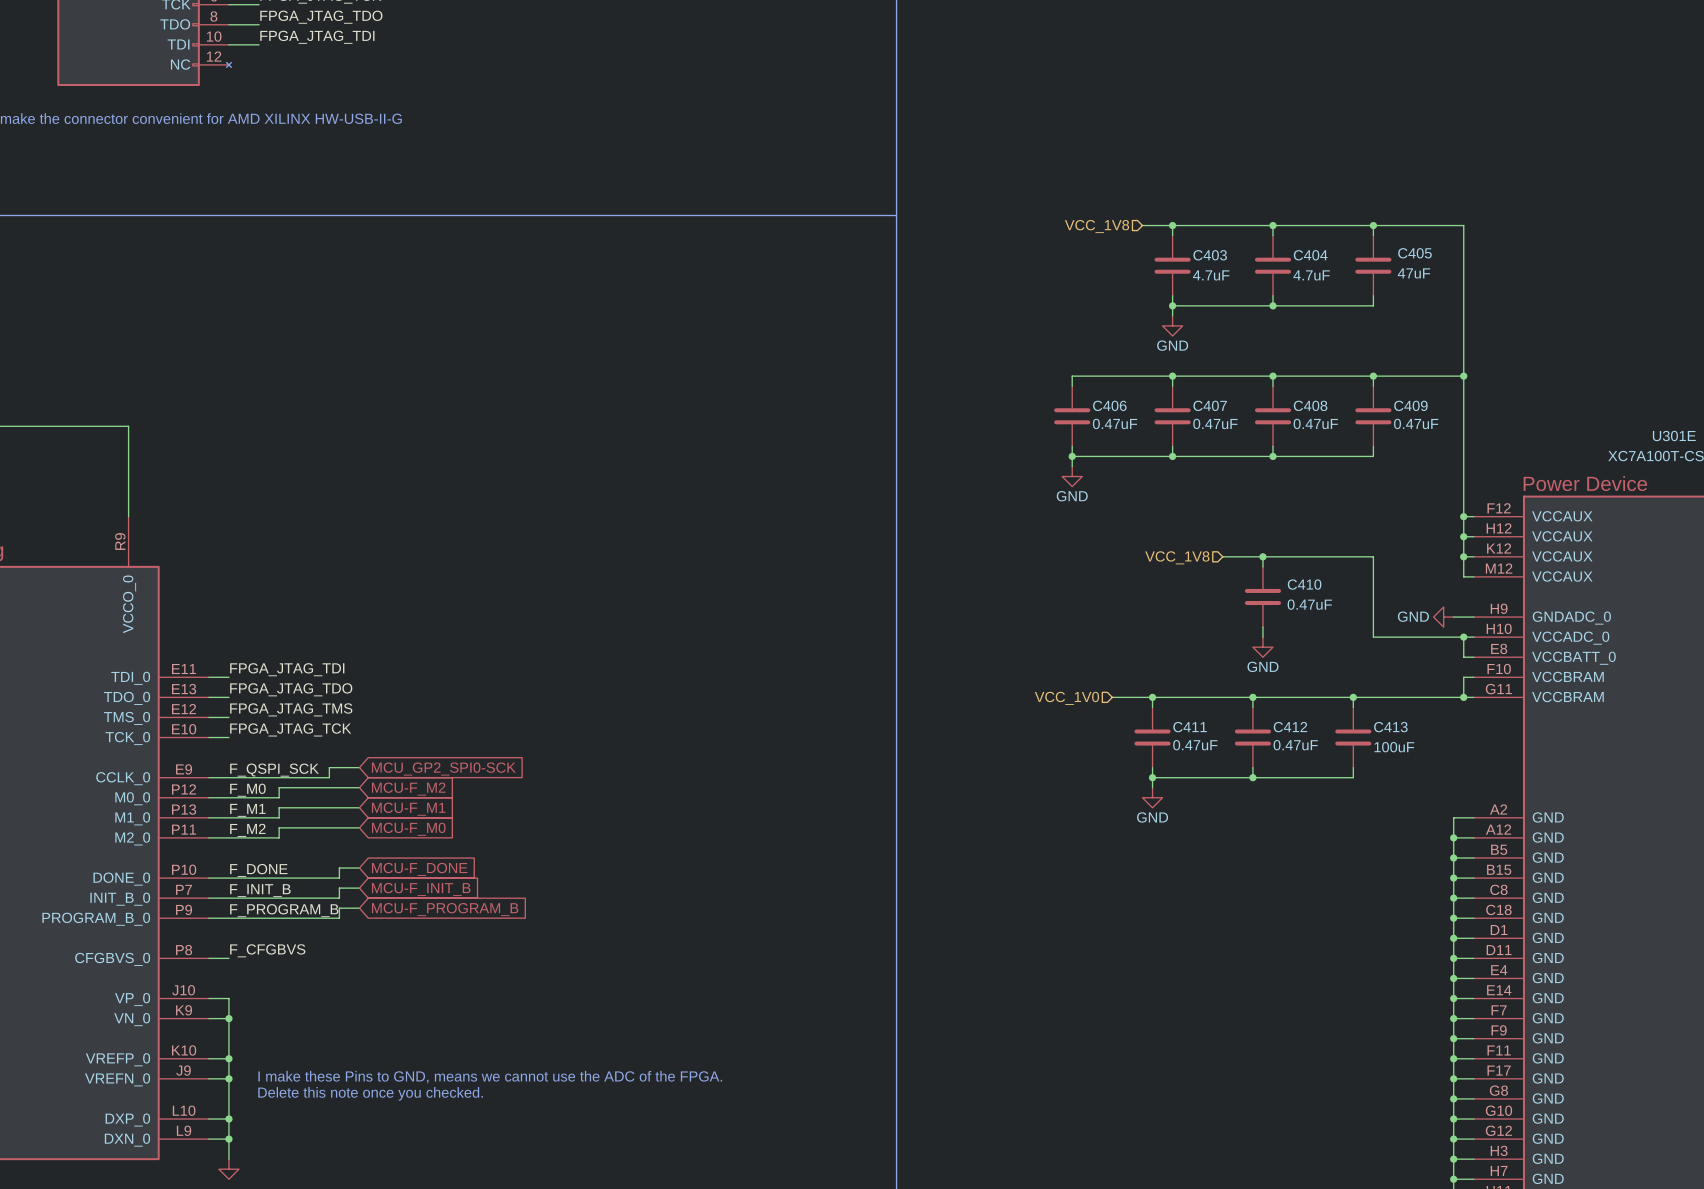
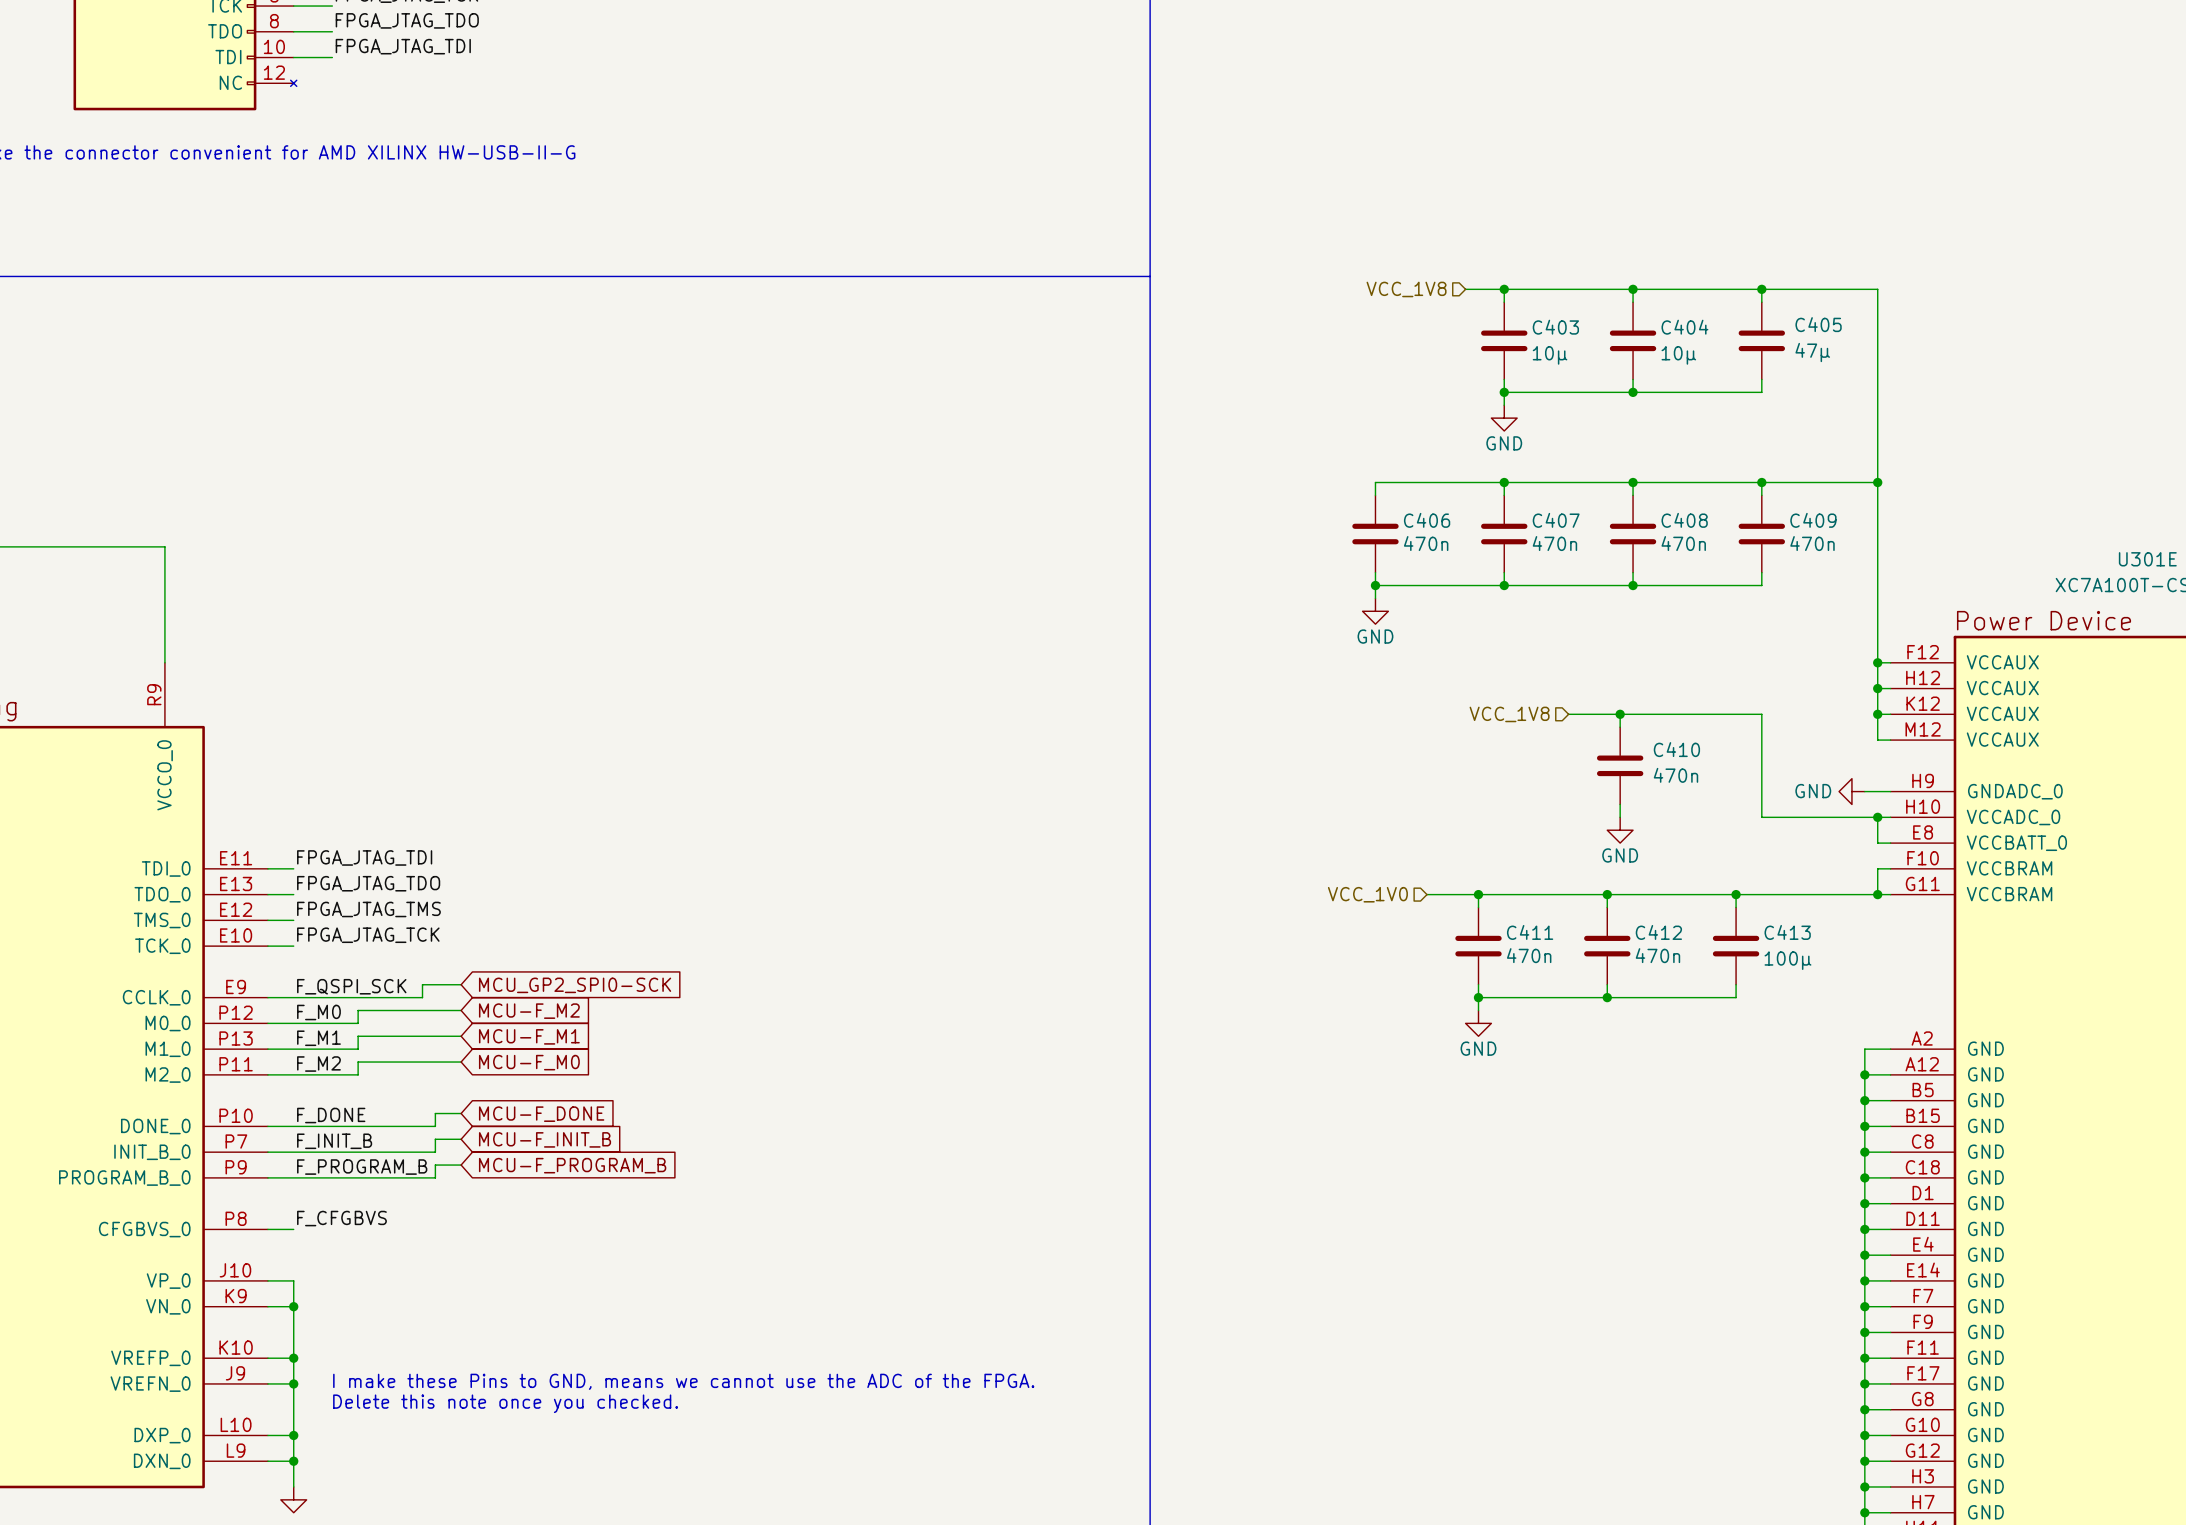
C405 value: 47uF (1413, 273) -> 47µ (1812, 352)
C403 value: 4.7uF (1211, 275) -> 10µ (1550, 355)
C404 value: 4.7uF (1311, 275) -> 10µ (1678, 355)
C406 value: 0.47uF (1115, 423) -> 470n (1426, 543)
C407 value: 0.47uF (1215, 423) -> 470n (1554, 543)
C408 value: 0.47uF (1315, 423) -> 470n (1683, 543)
C409 value: 0.47uF (1416, 423) -> 470n (1812, 543)
C410 value: 0.47uF (1309, 604) -> 470n (1675, 775)
C411 value: 0.47uF (1195, 745) -> 470n (1529, 955)
C412 value: 0.47uF (1295, 745) -> 470n (1657, 955)
C413 value: 100uF (1394, 747) -> 100µ (1787, 960)

